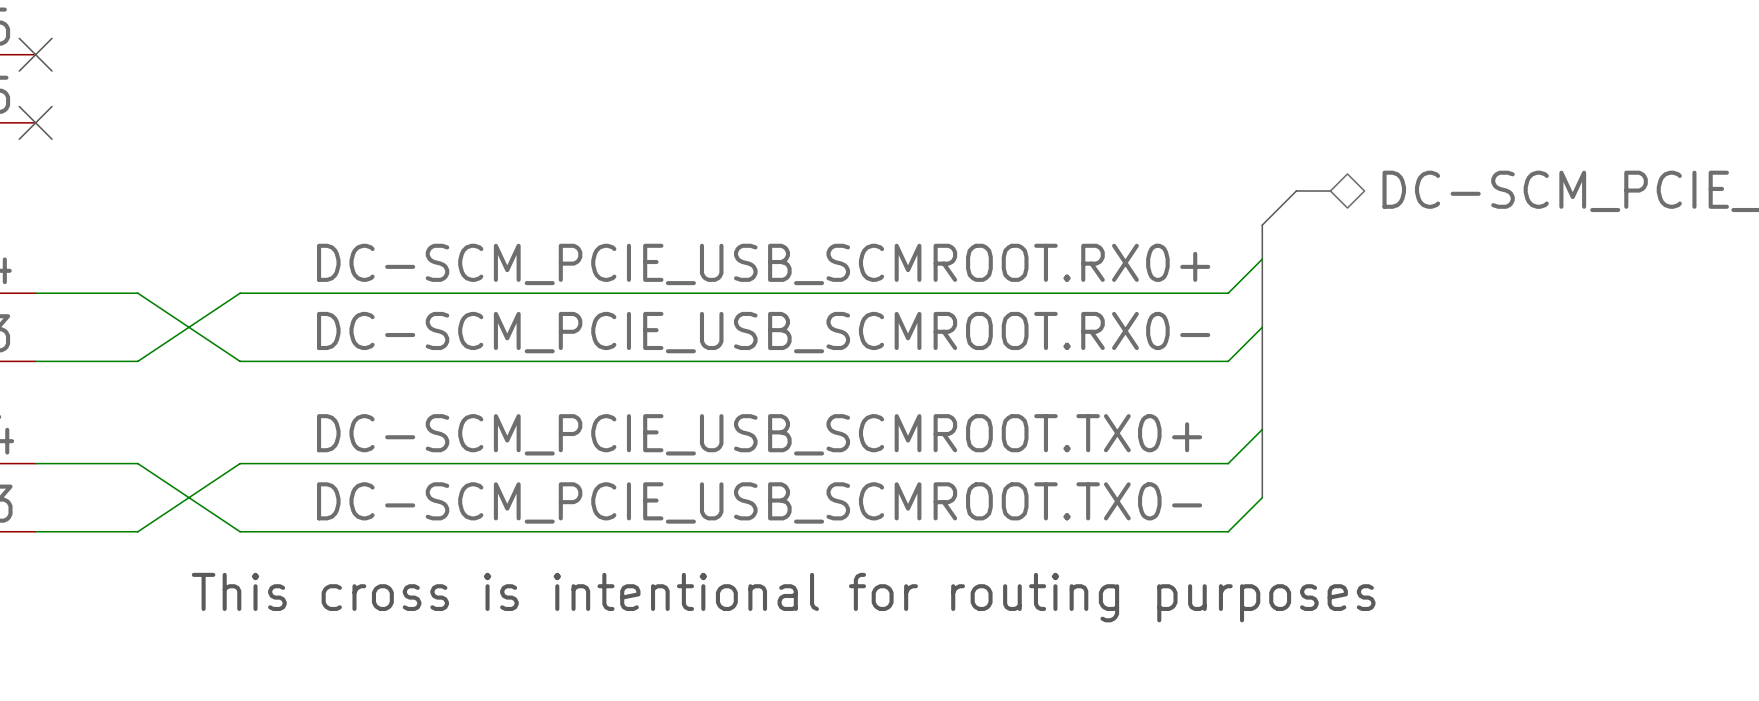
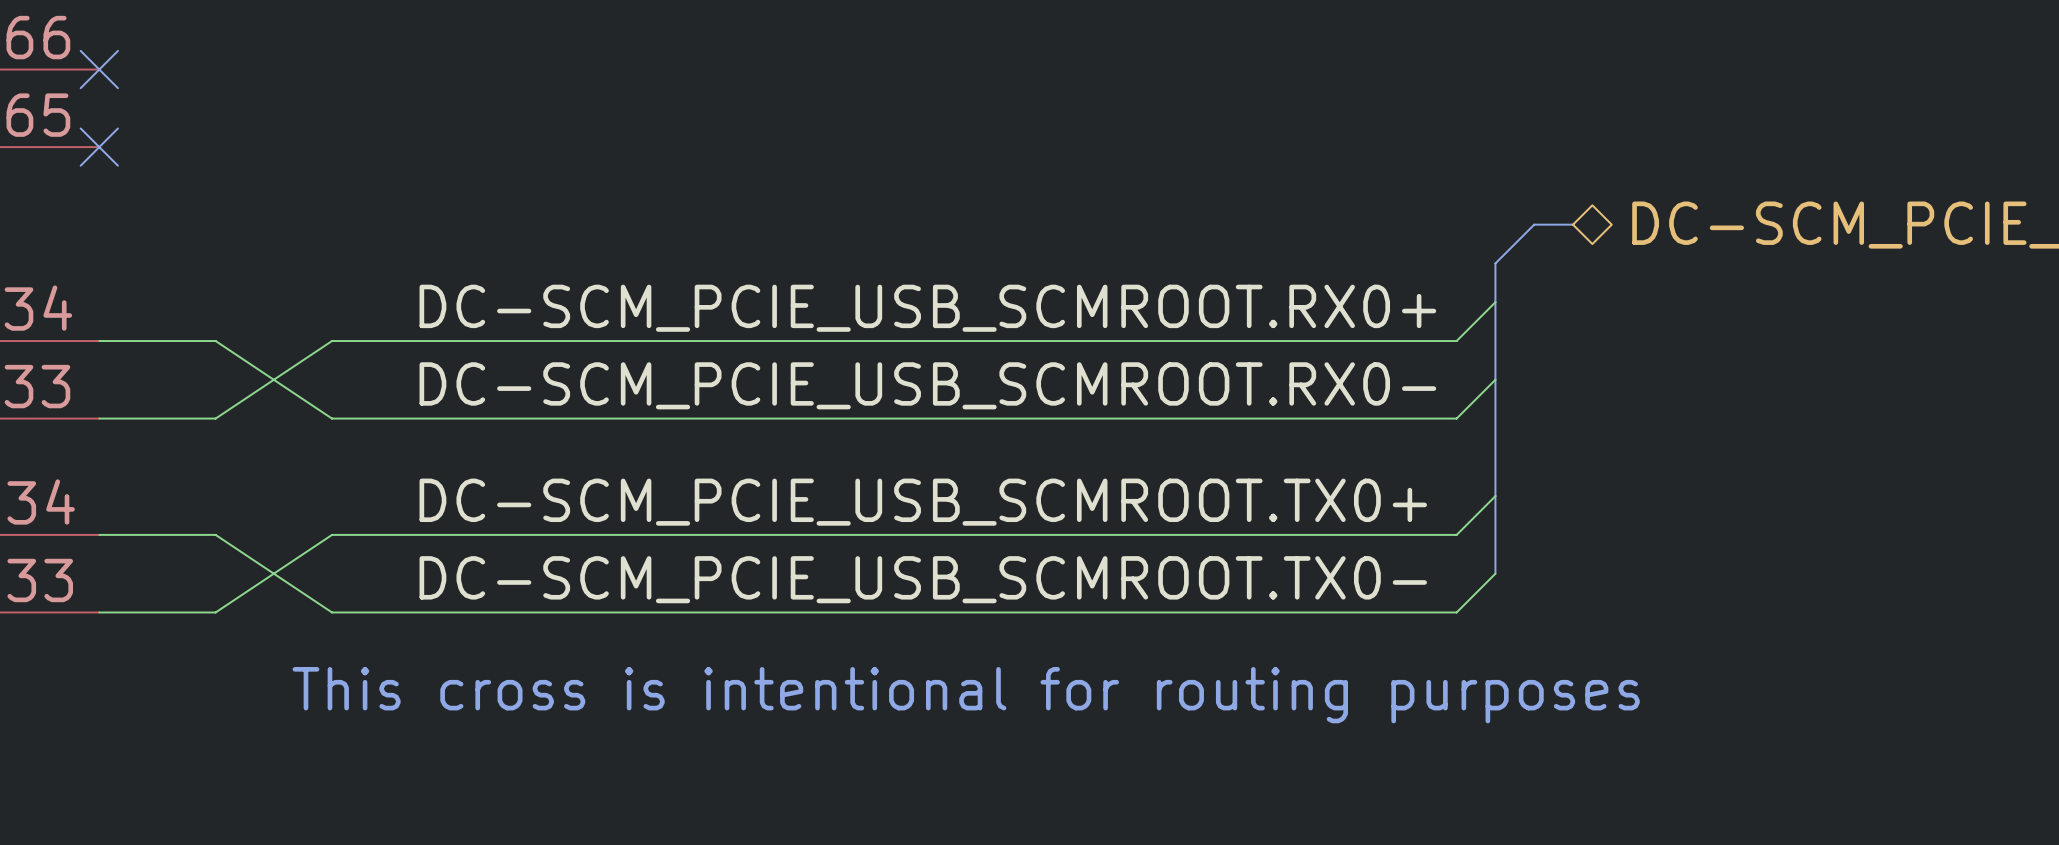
text position: This cross is intentional for routing purposes (783, 597) -> This cross is intentional for routing purposes (966, 695)

